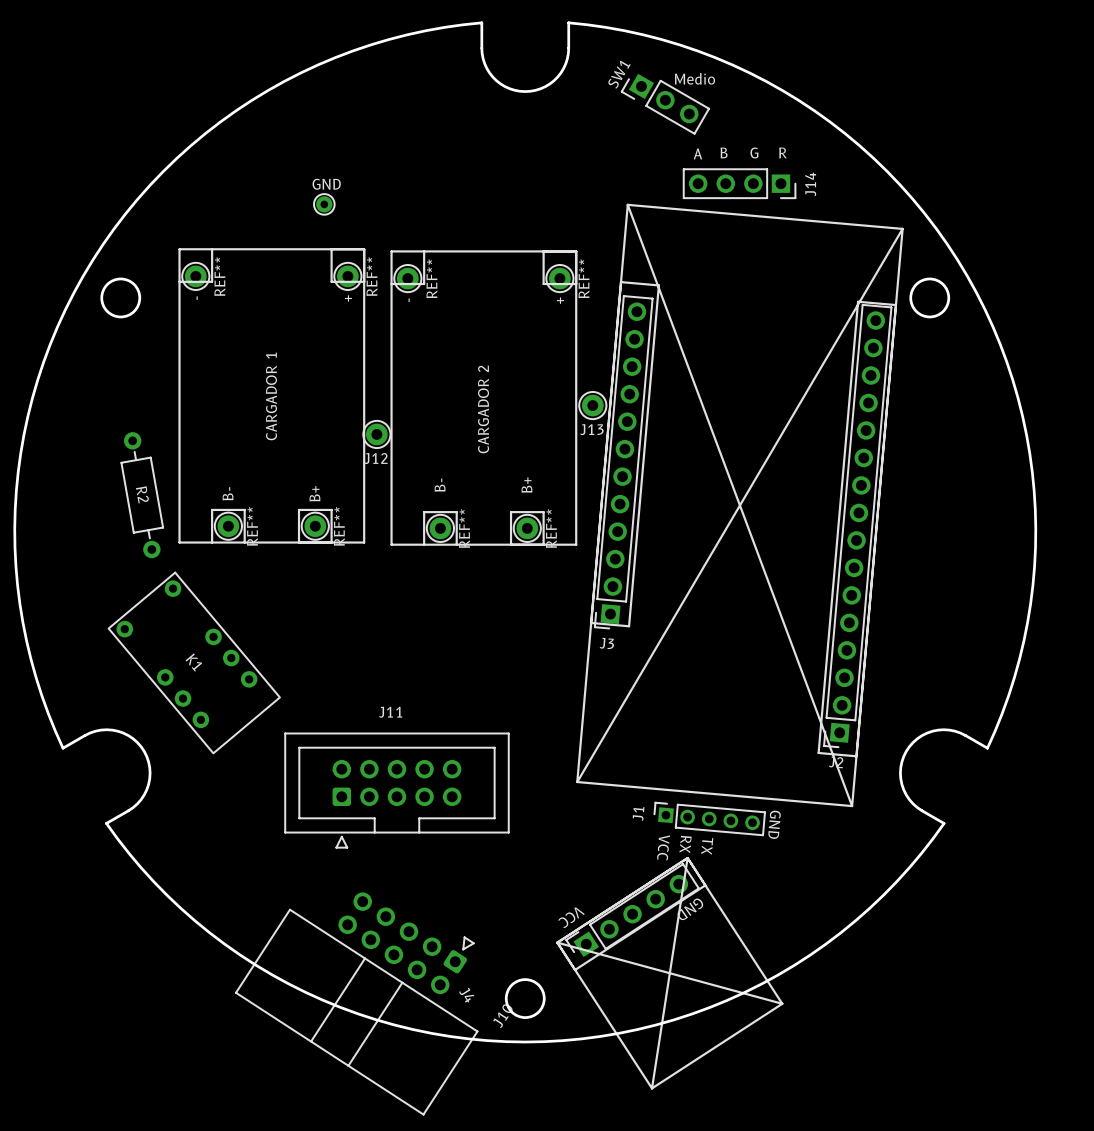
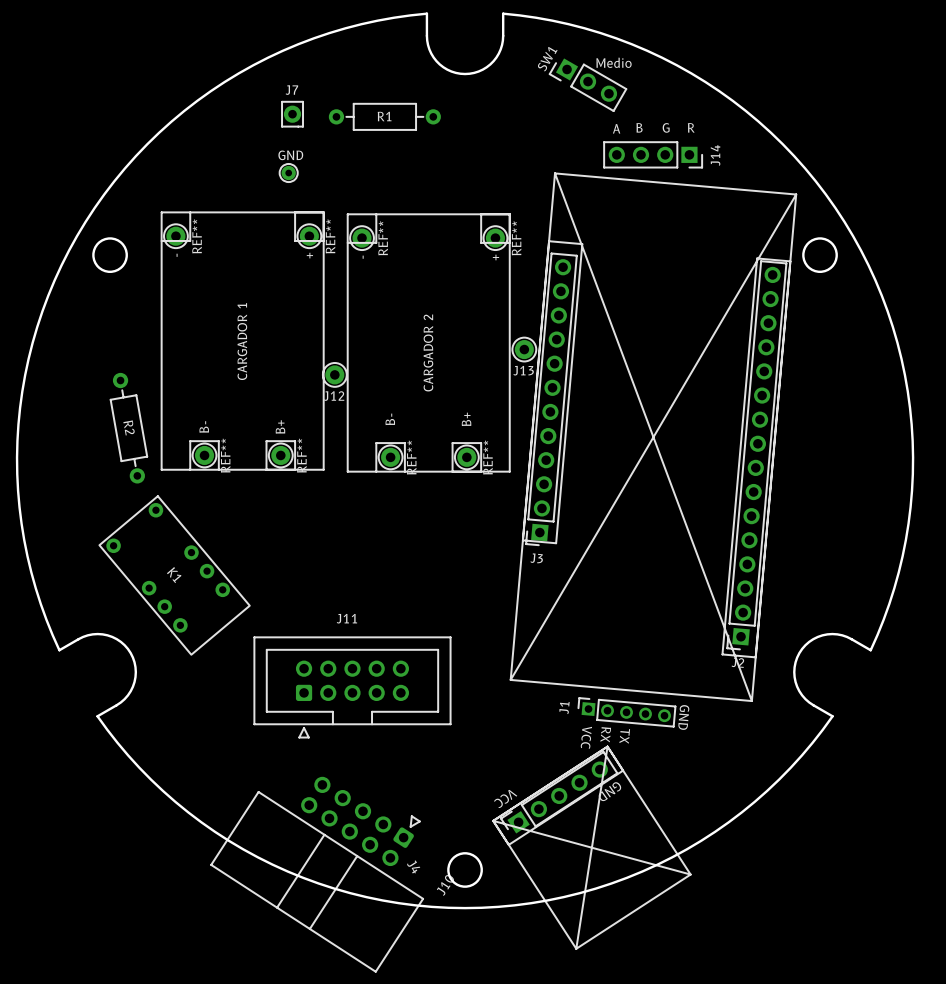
J7: none -> (292, 114)
R1: none -> (384, 116)

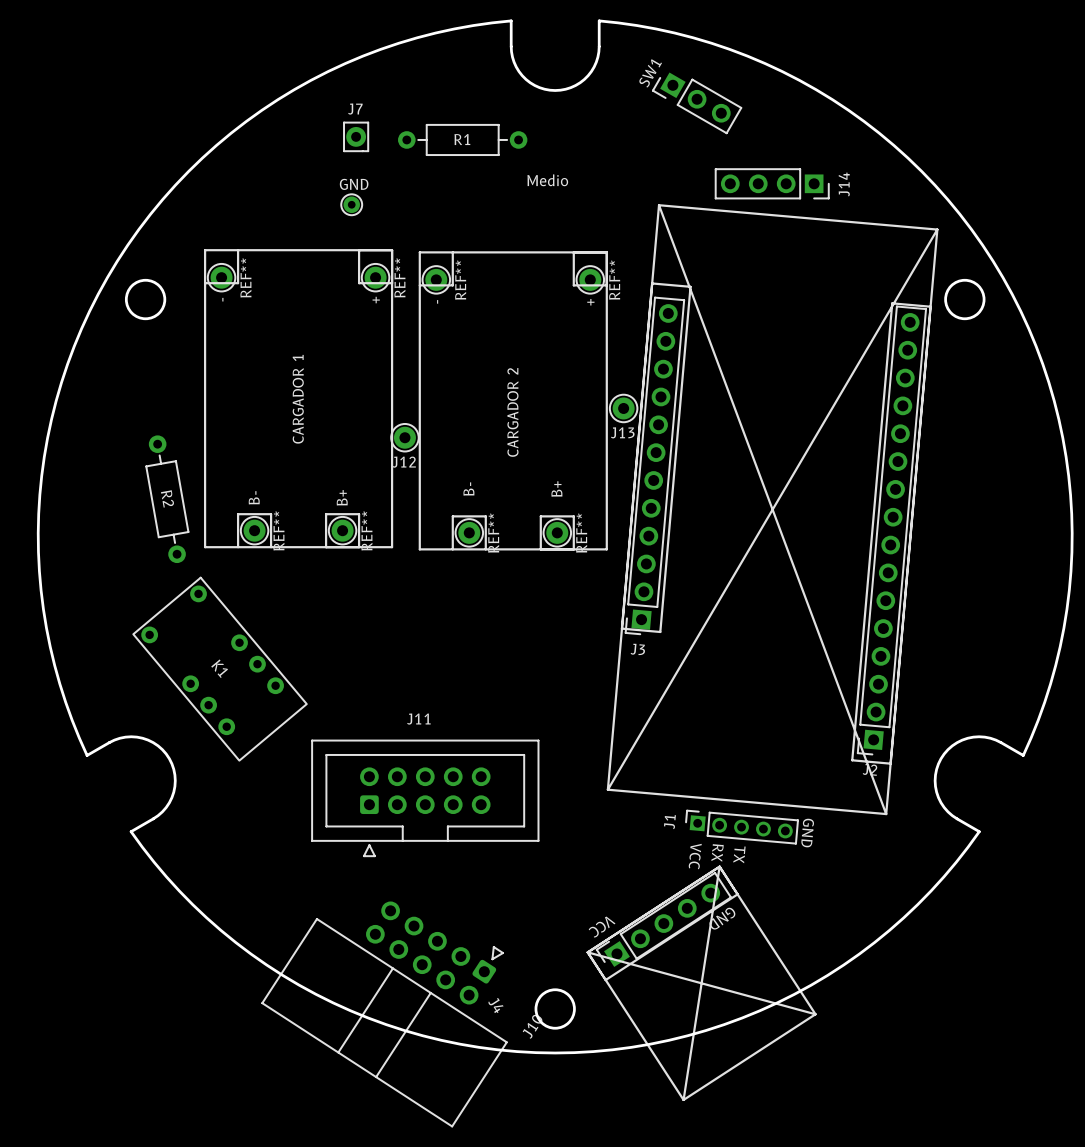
text position: Medio (613, 62) -> Medio (547, 180)
text: B (639, 127) -> none
text: G (666, 127) -> none
text: R (691, 127) -> none
text: A (616, 128) -> none

